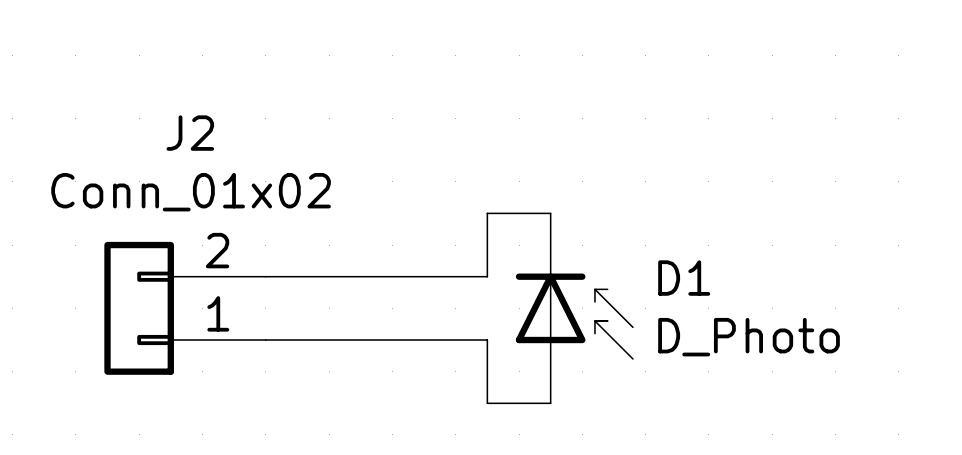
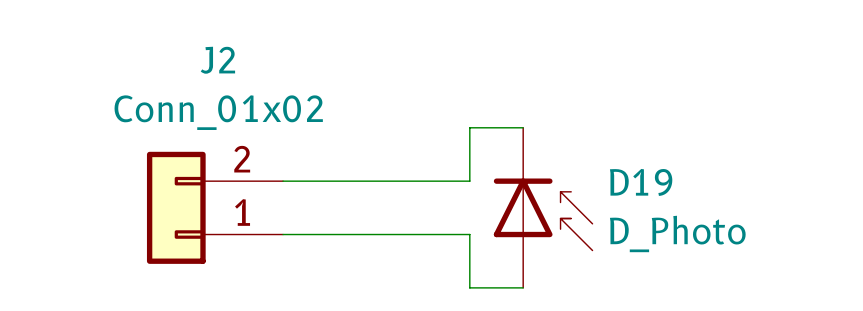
D1 name: D1 (684, 278) -> D19 (641, 182)

